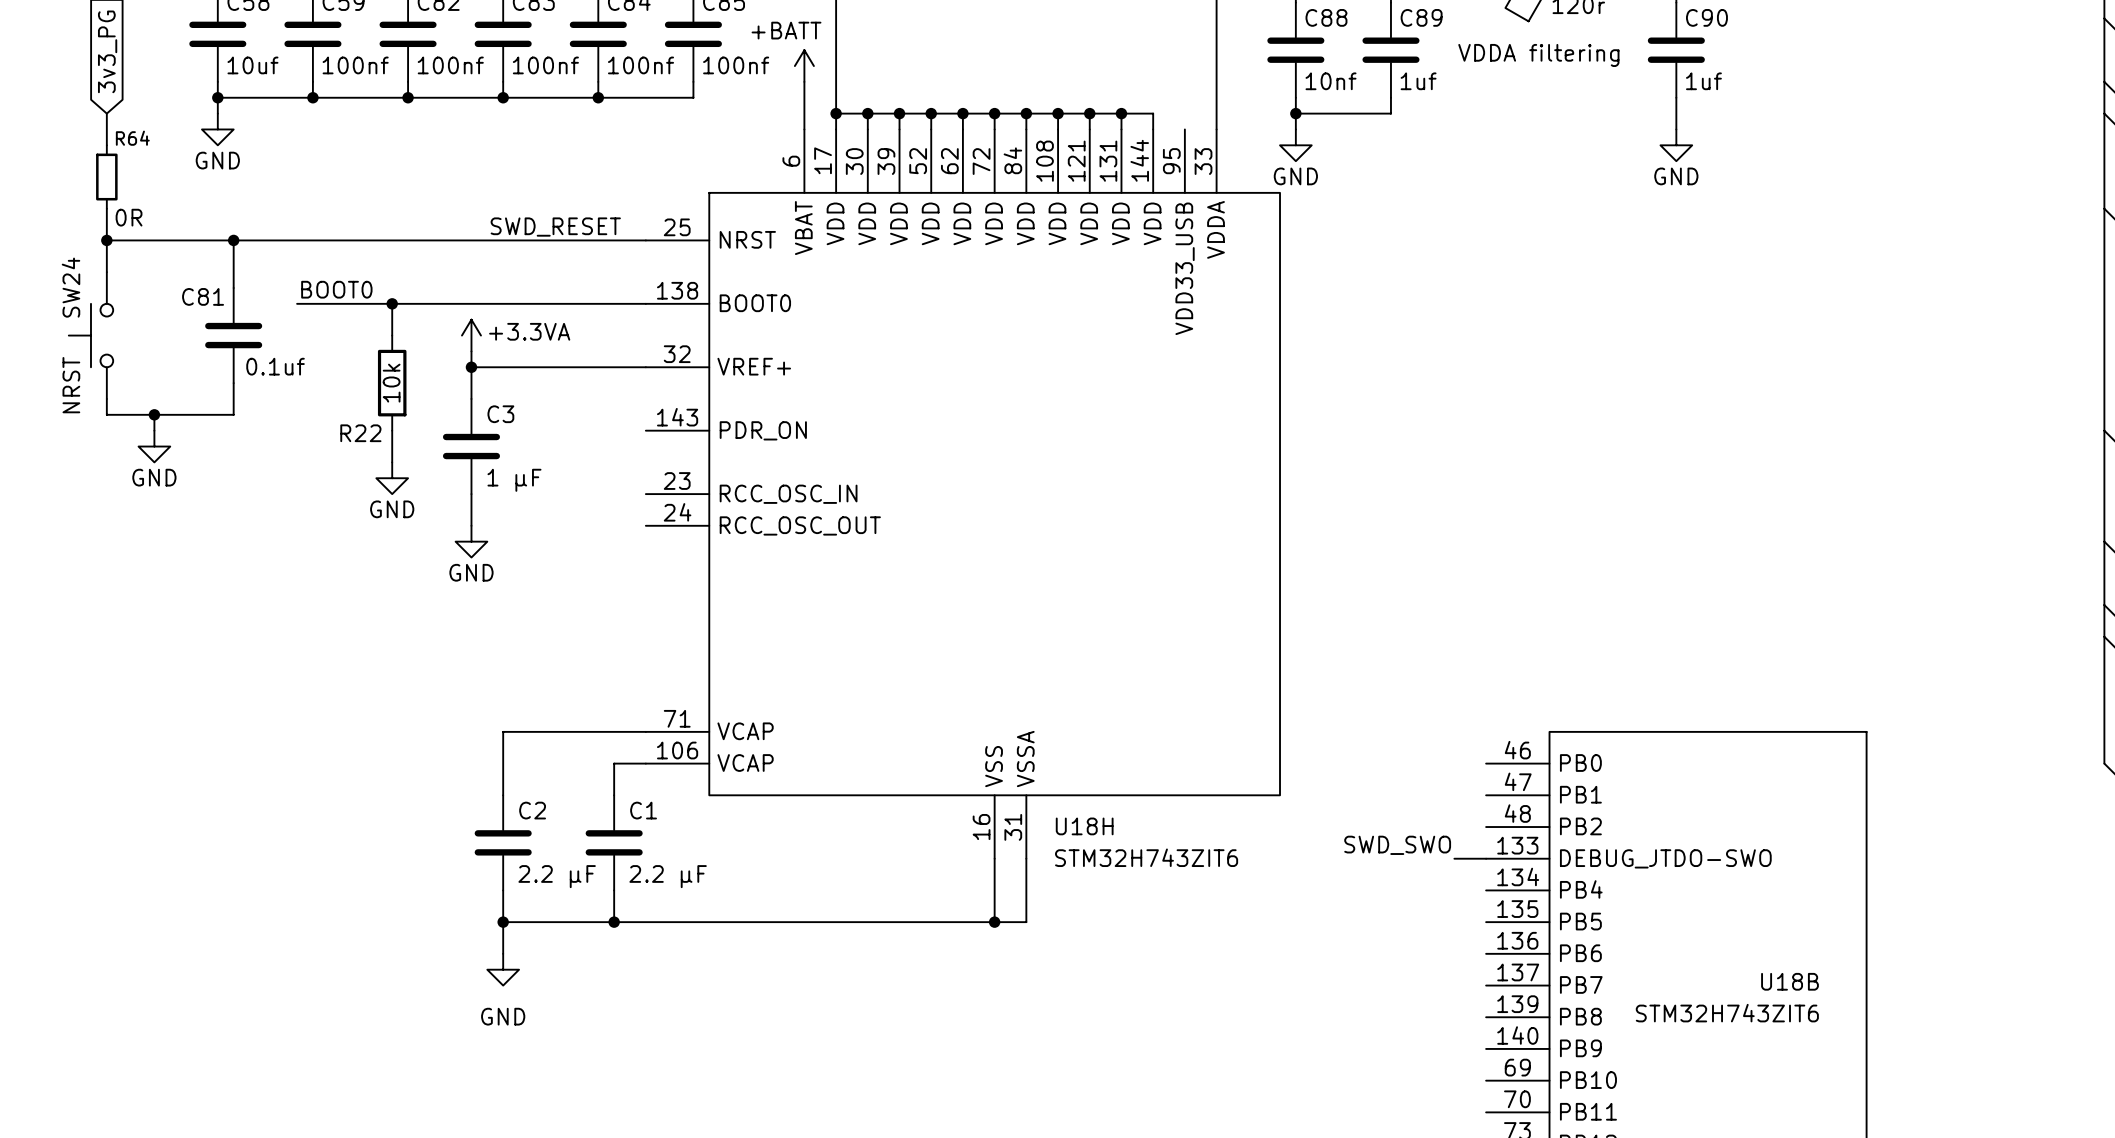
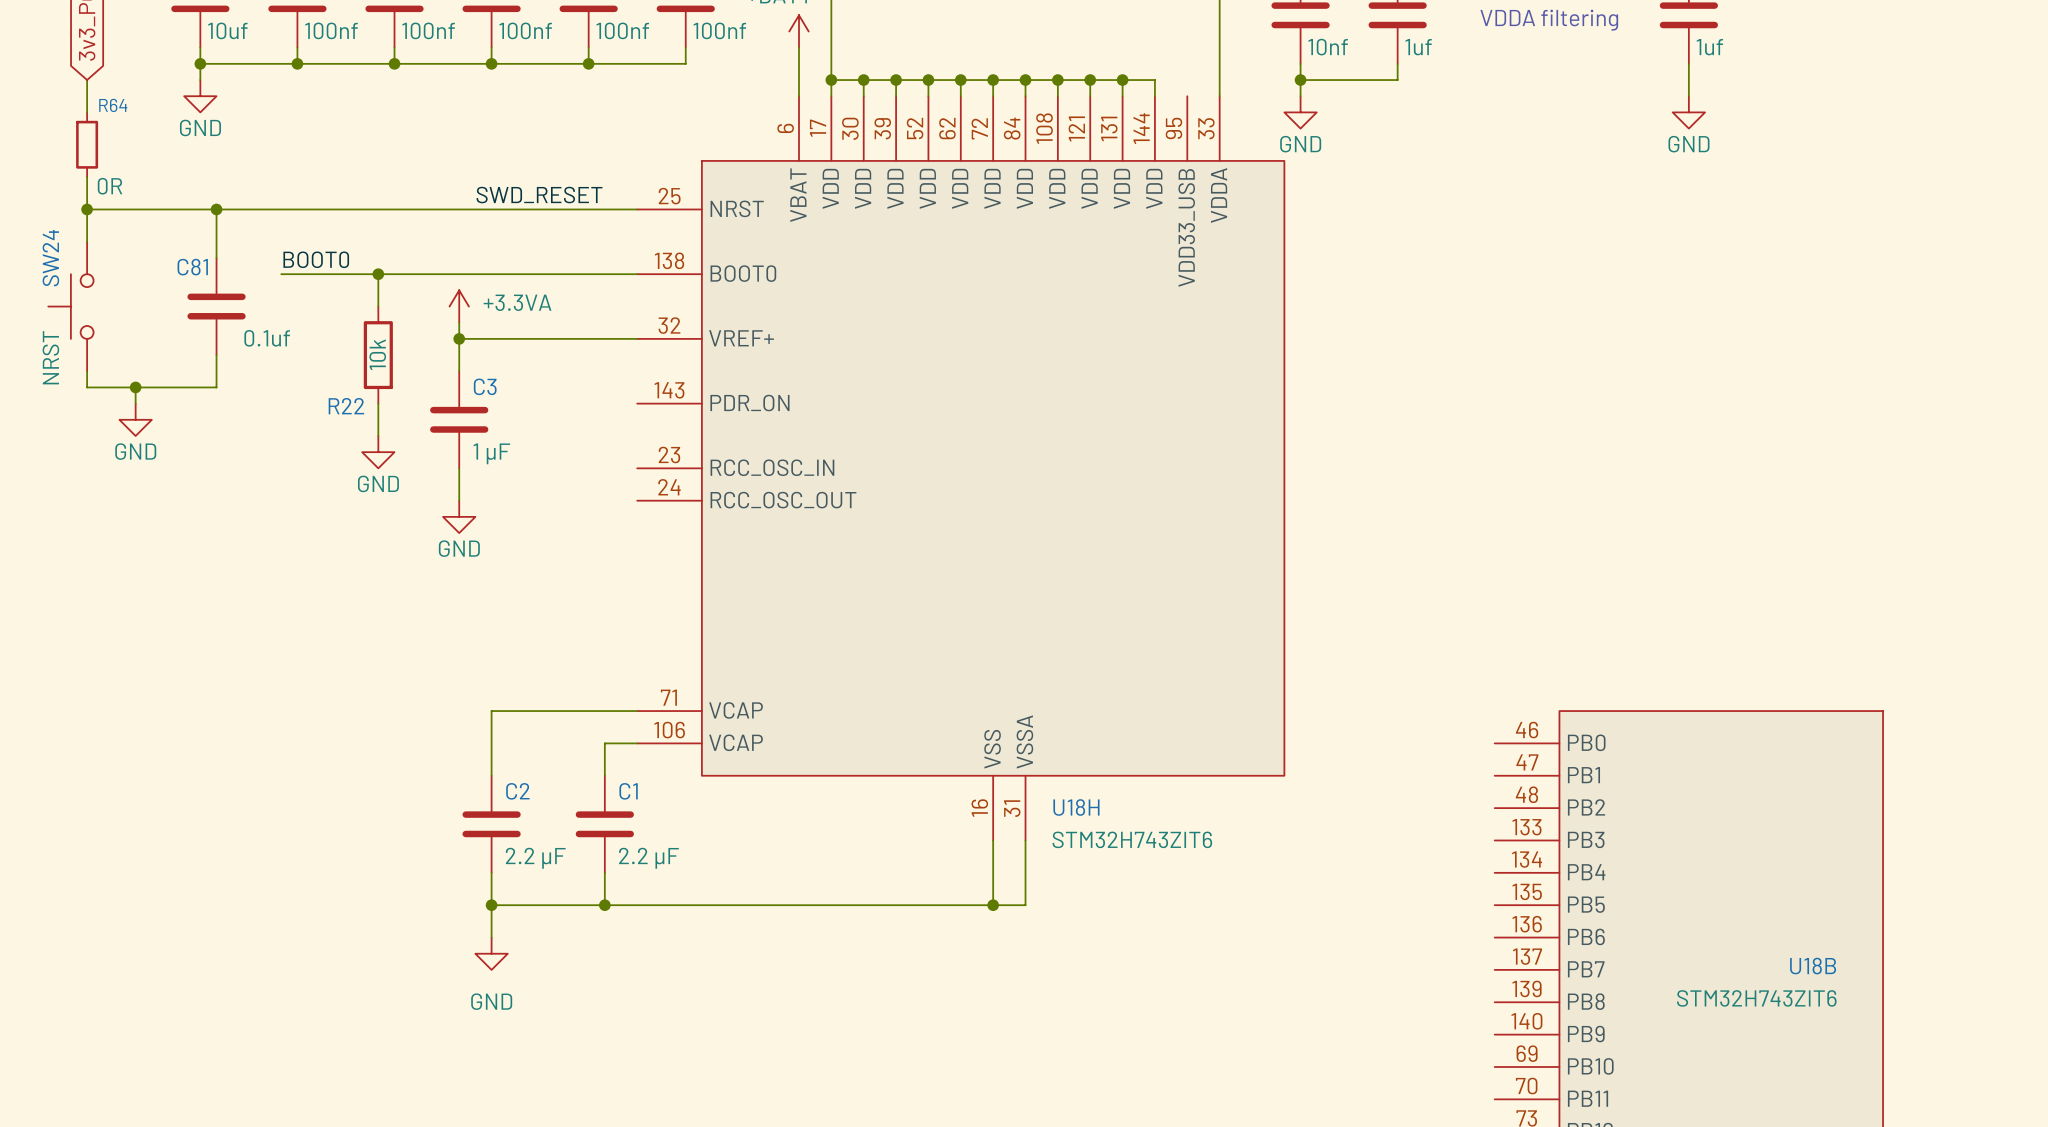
label: SWD_SWO (1397, 845) -> none
wire: (1454, 858) (1486, 858) -> none
U18B pin name: DEBUG_JTDO-SWO (1665, 858) -> PB3 (1586, 839)

